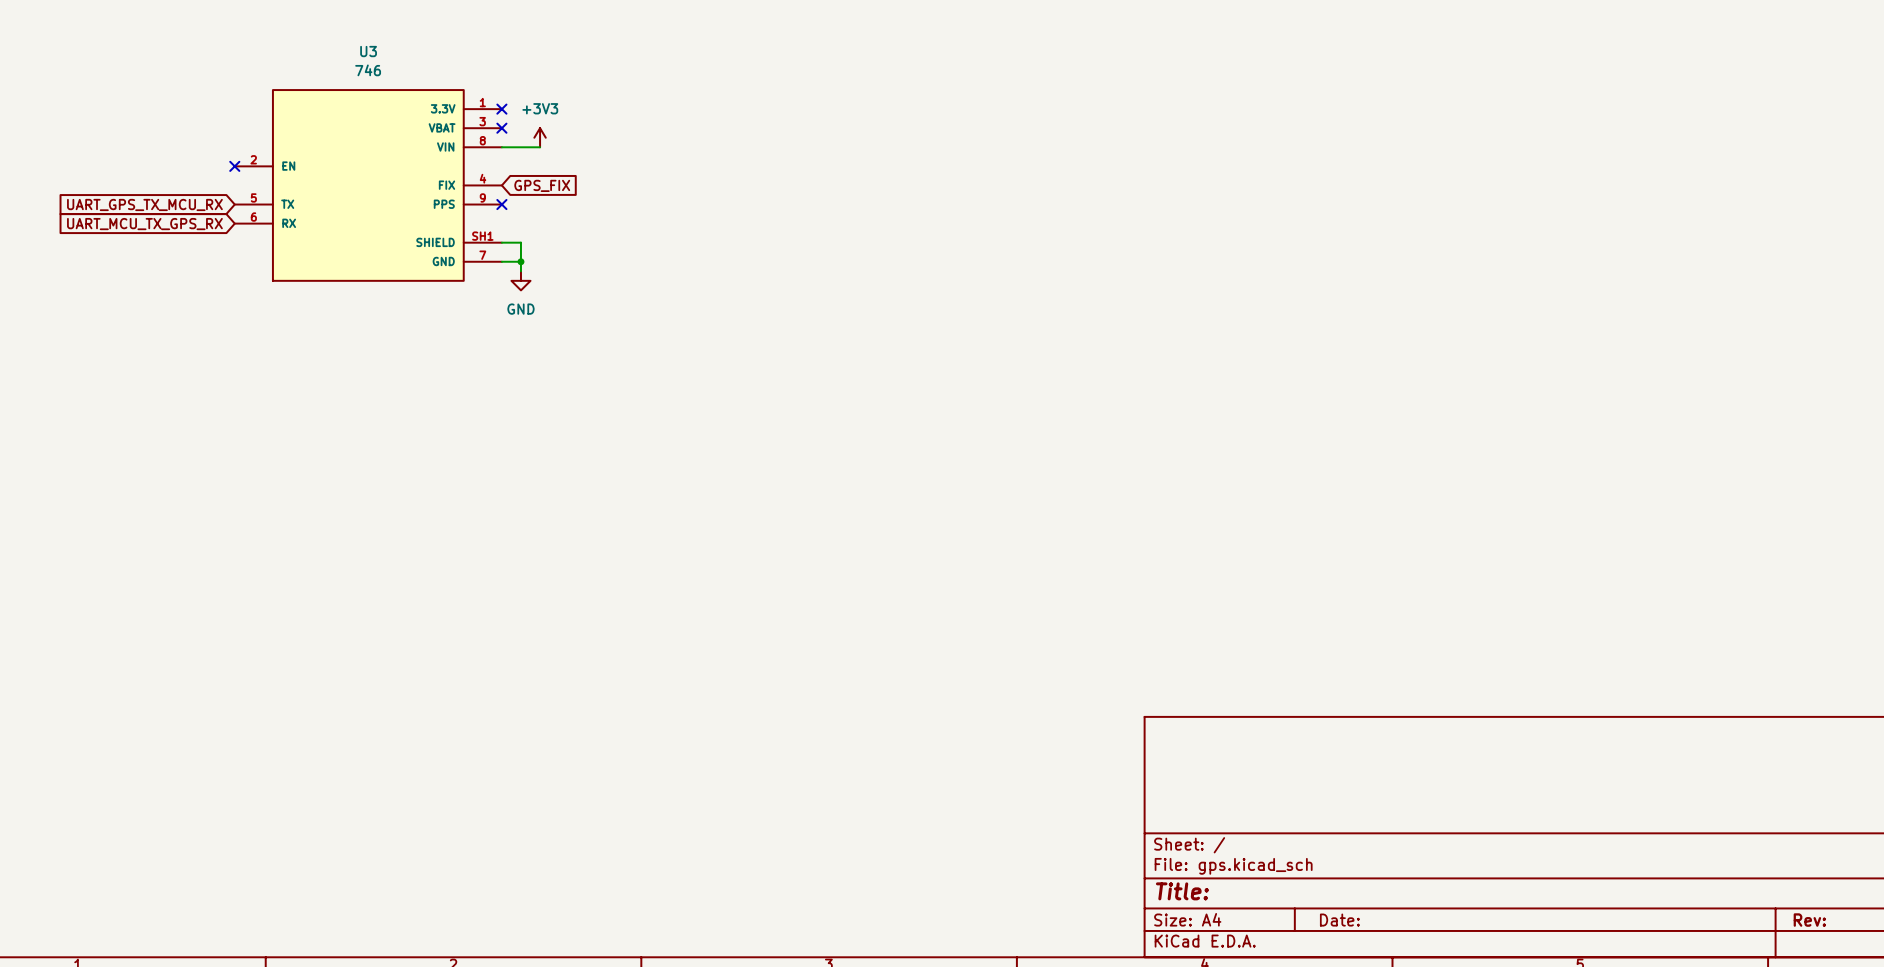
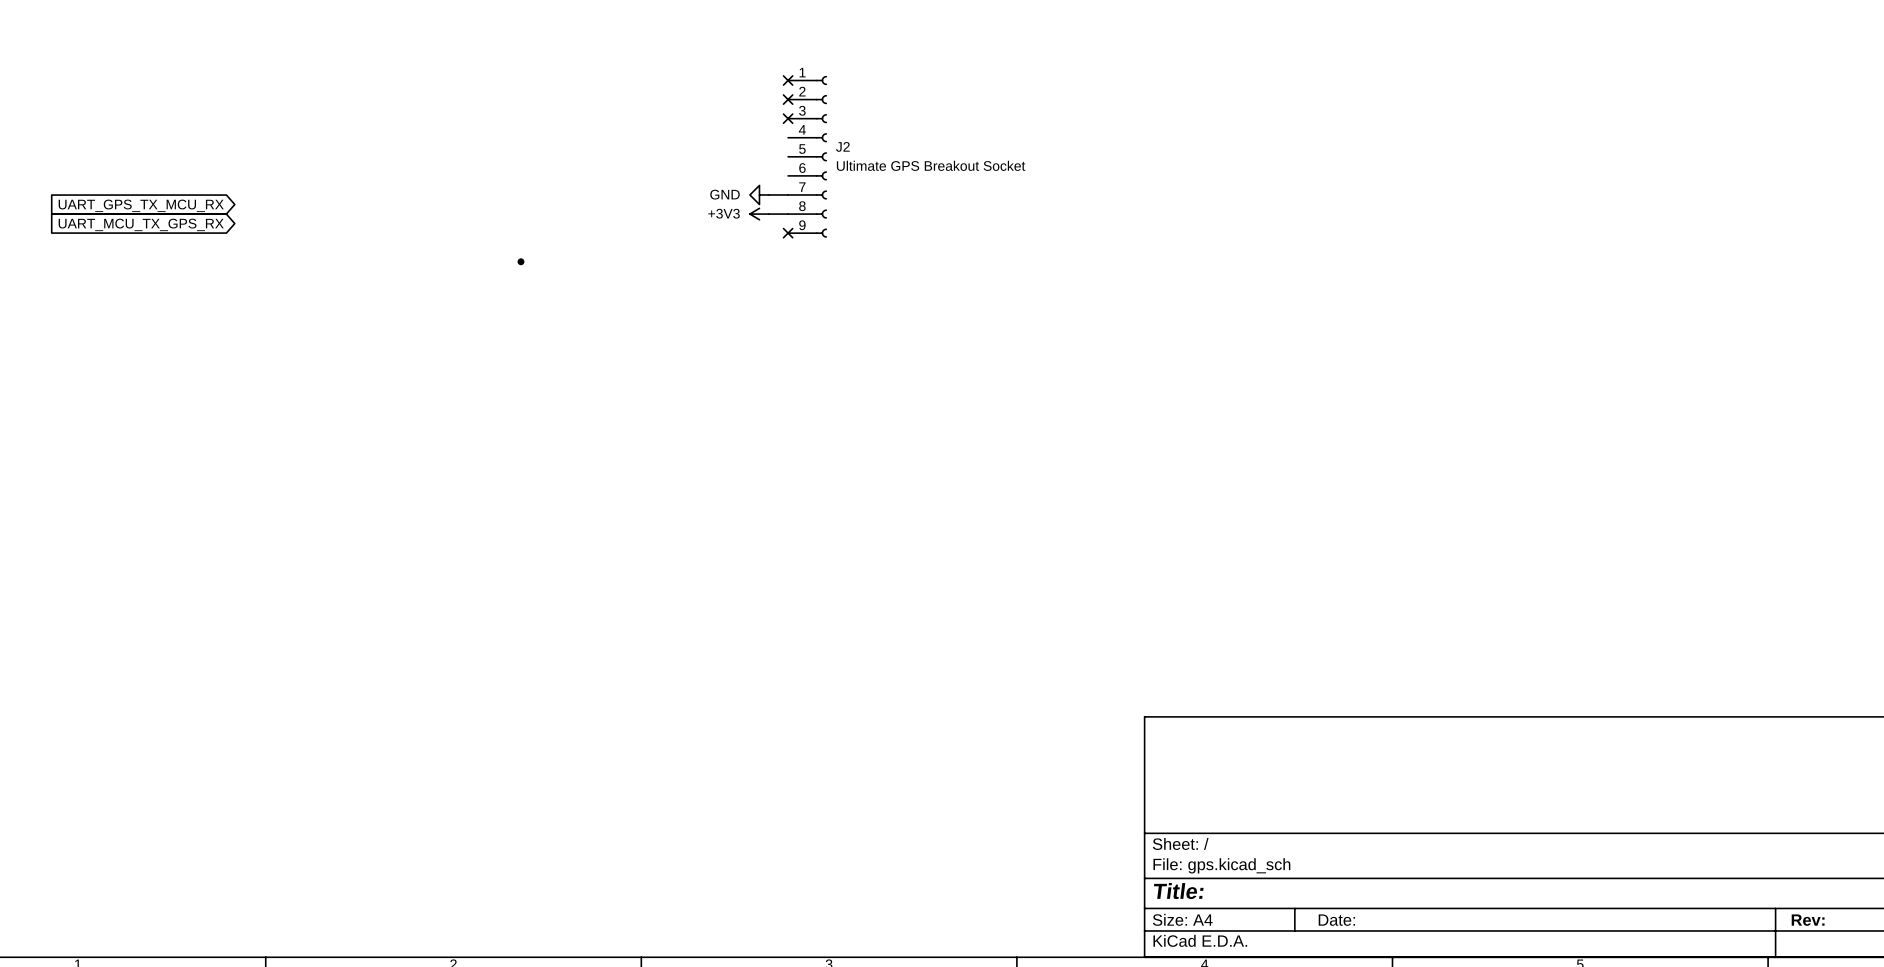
no-connect mark: none -> (788, 80)
no-connect mark: none -> (788, 99)
no-connect mark: (501, 109) -> none
no-connect mark: none -> (788, 118)
no-connect mark: (501, 128) -> none
power symbol: +3V3 (540, 137) -> none
wire: (501, 147) (540, 147) -> none
J2: none -> Ultimate GPS Breakout Socket (807, 156)
no-connect mark: (234, 166) -> none
U3: 746 (368, 185) -> none
global label: GPS_FIX (542, 185) -> none
power symbol: none -> GND (759, 194)
wire: none -> (769, 194) (788, 194)
no-connect mark: (501, 204) -> none
power symbol: none -> +3V3 (759, 214)
wire: none -> (769, 214) (788, 214)
no-connect mark: none -> (788, 233)
wire: (501, 242) (520, 242) (520, 271) -> none
wire: (501, 261) (520, 261) -> none
power symbol: GND (520, 280) -> none

